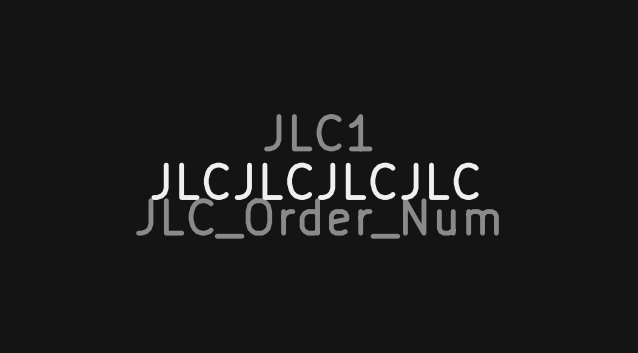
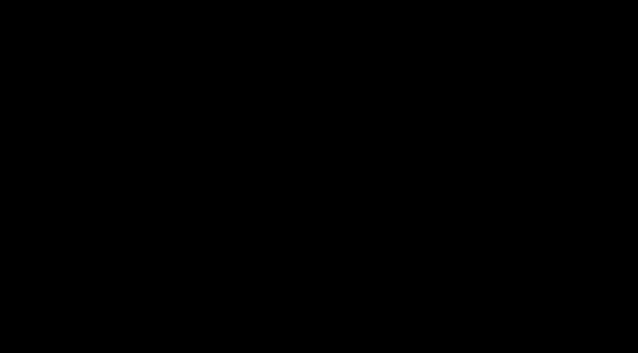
JLC1: JLC_Order_Num (317, 176) -> none

